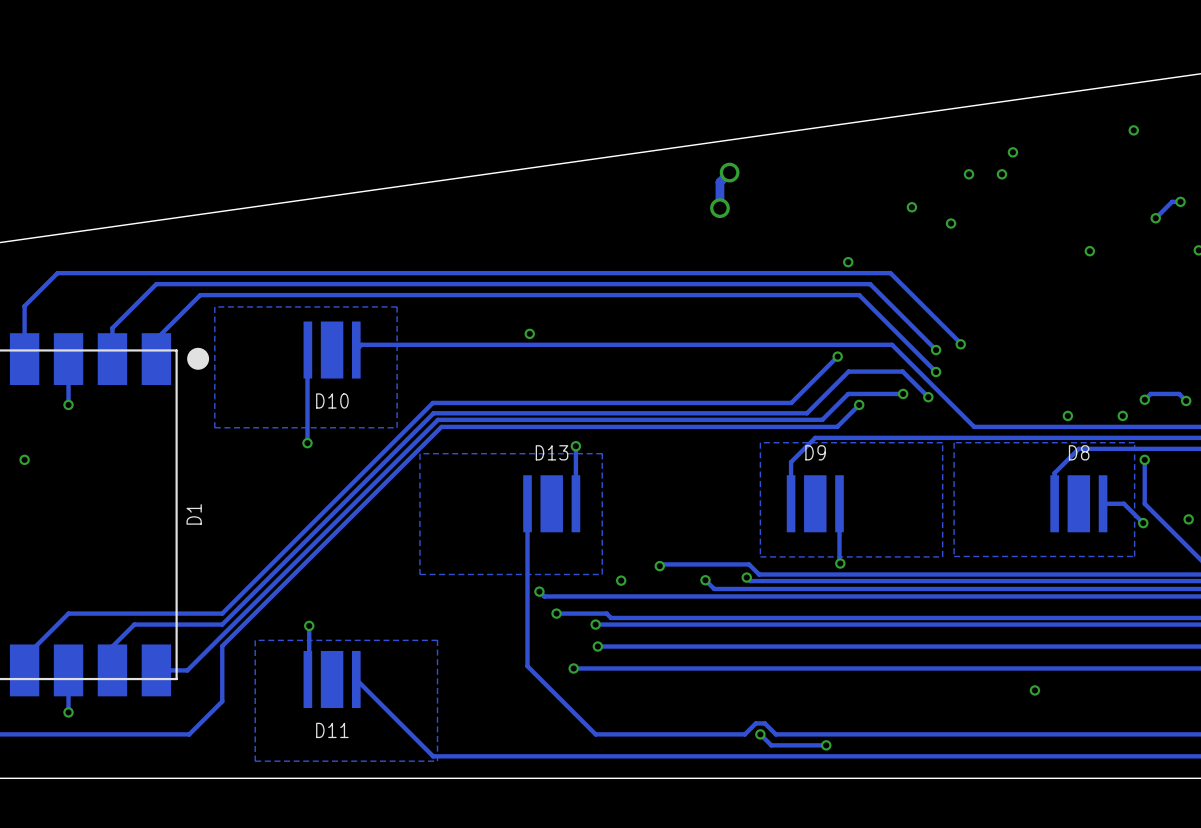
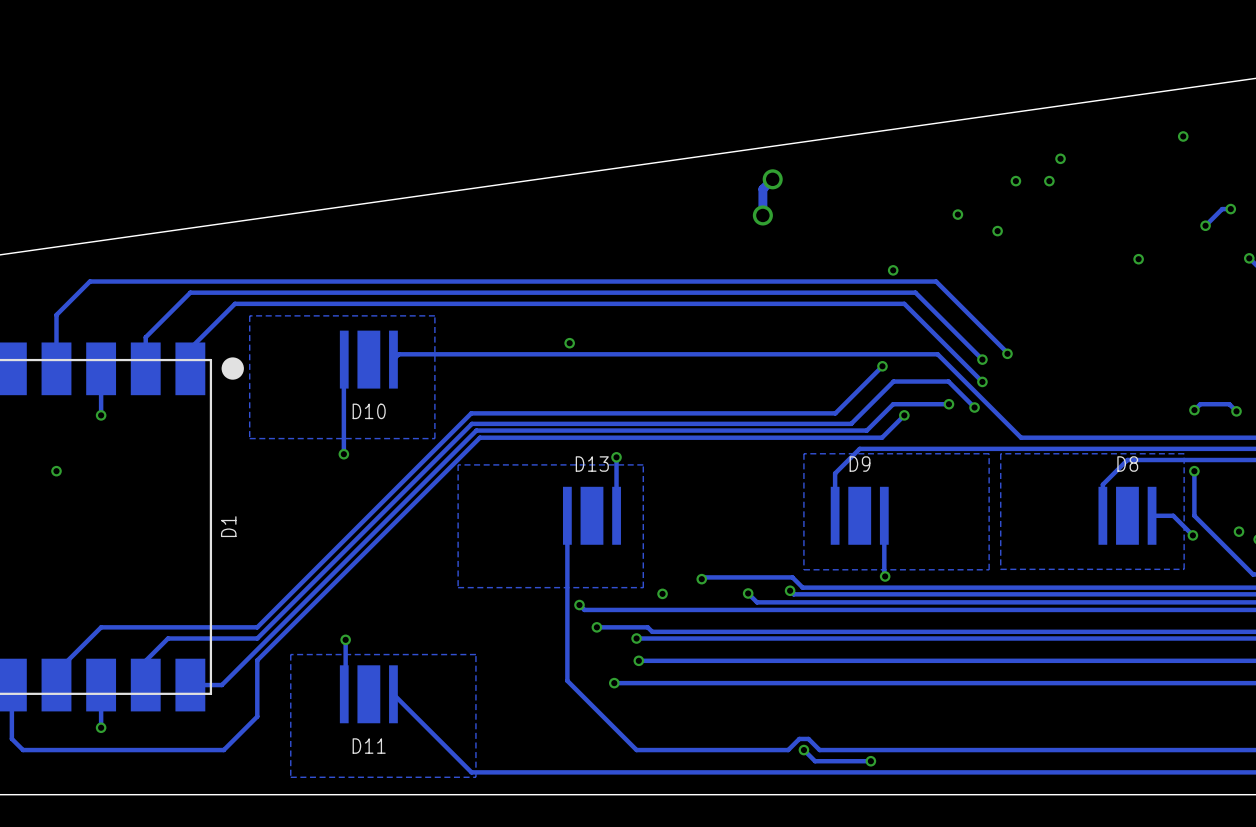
via: (1067, 415) -> none
via: (1122, 415) -> none
via: (1034, 690) -> none

